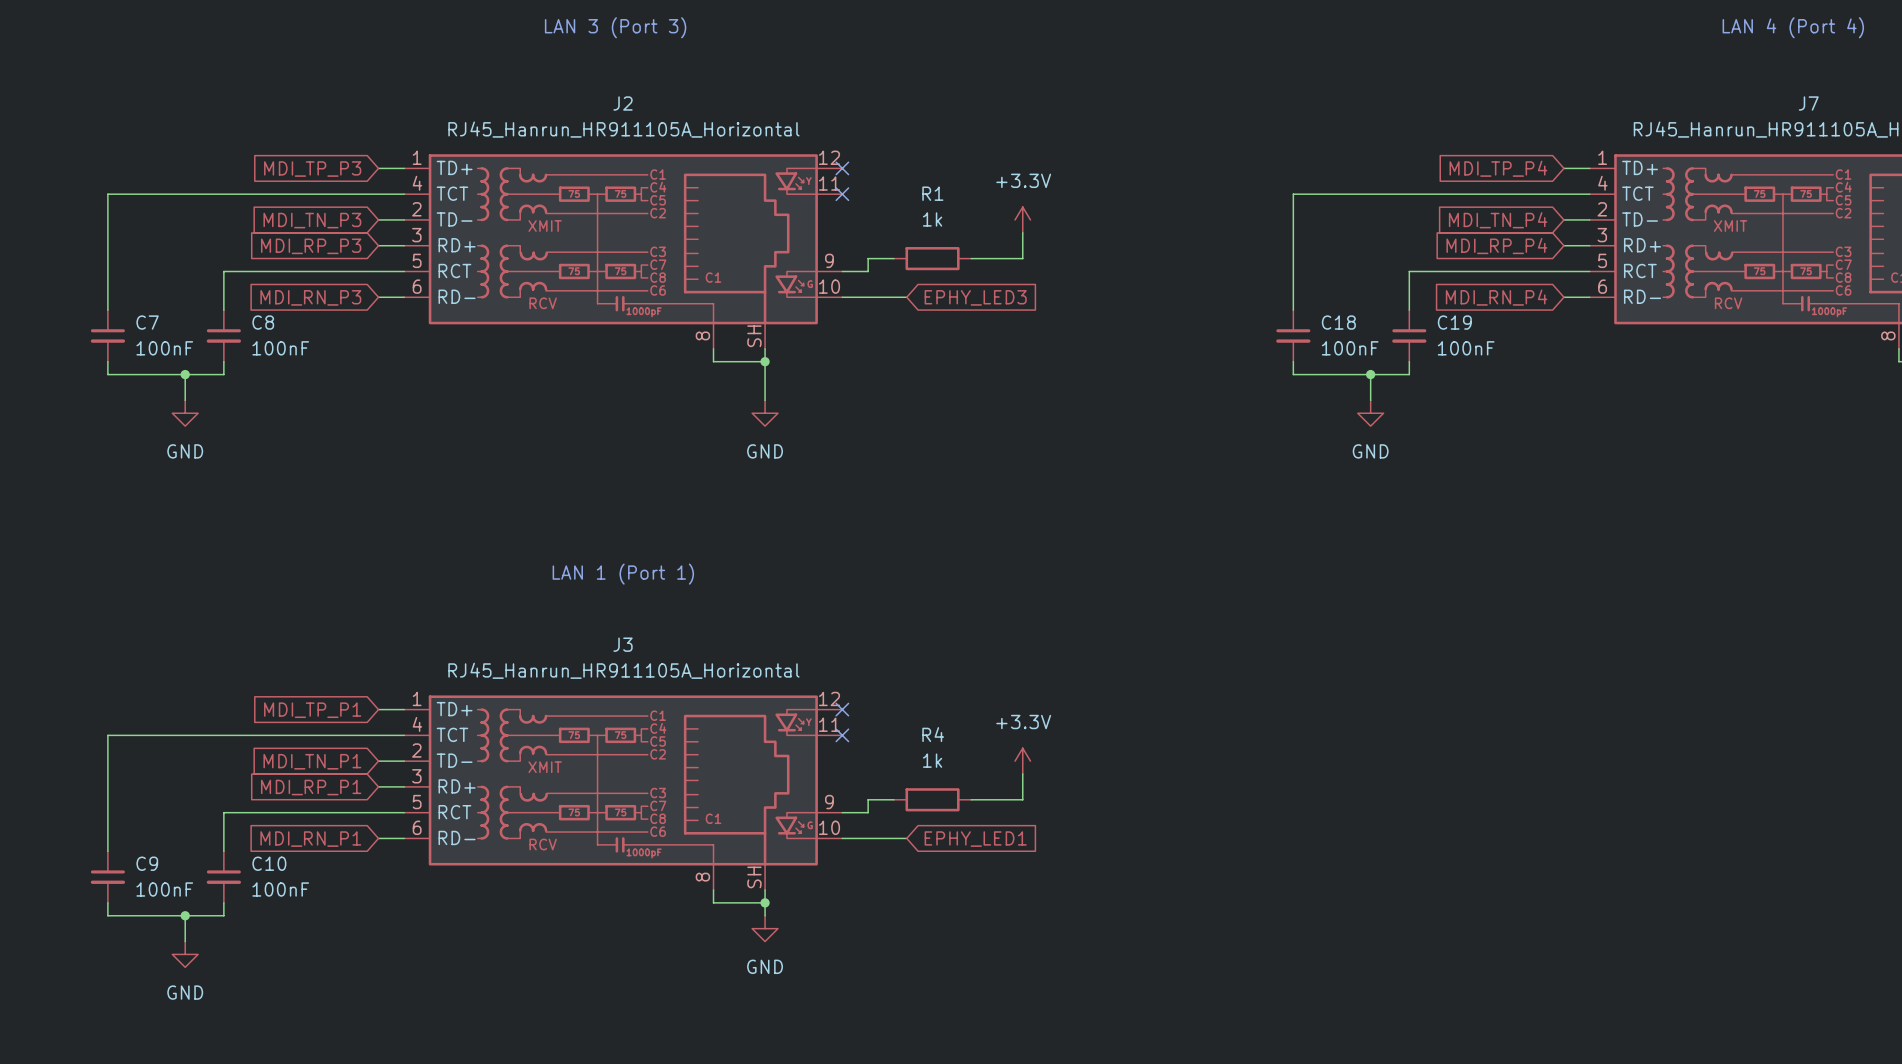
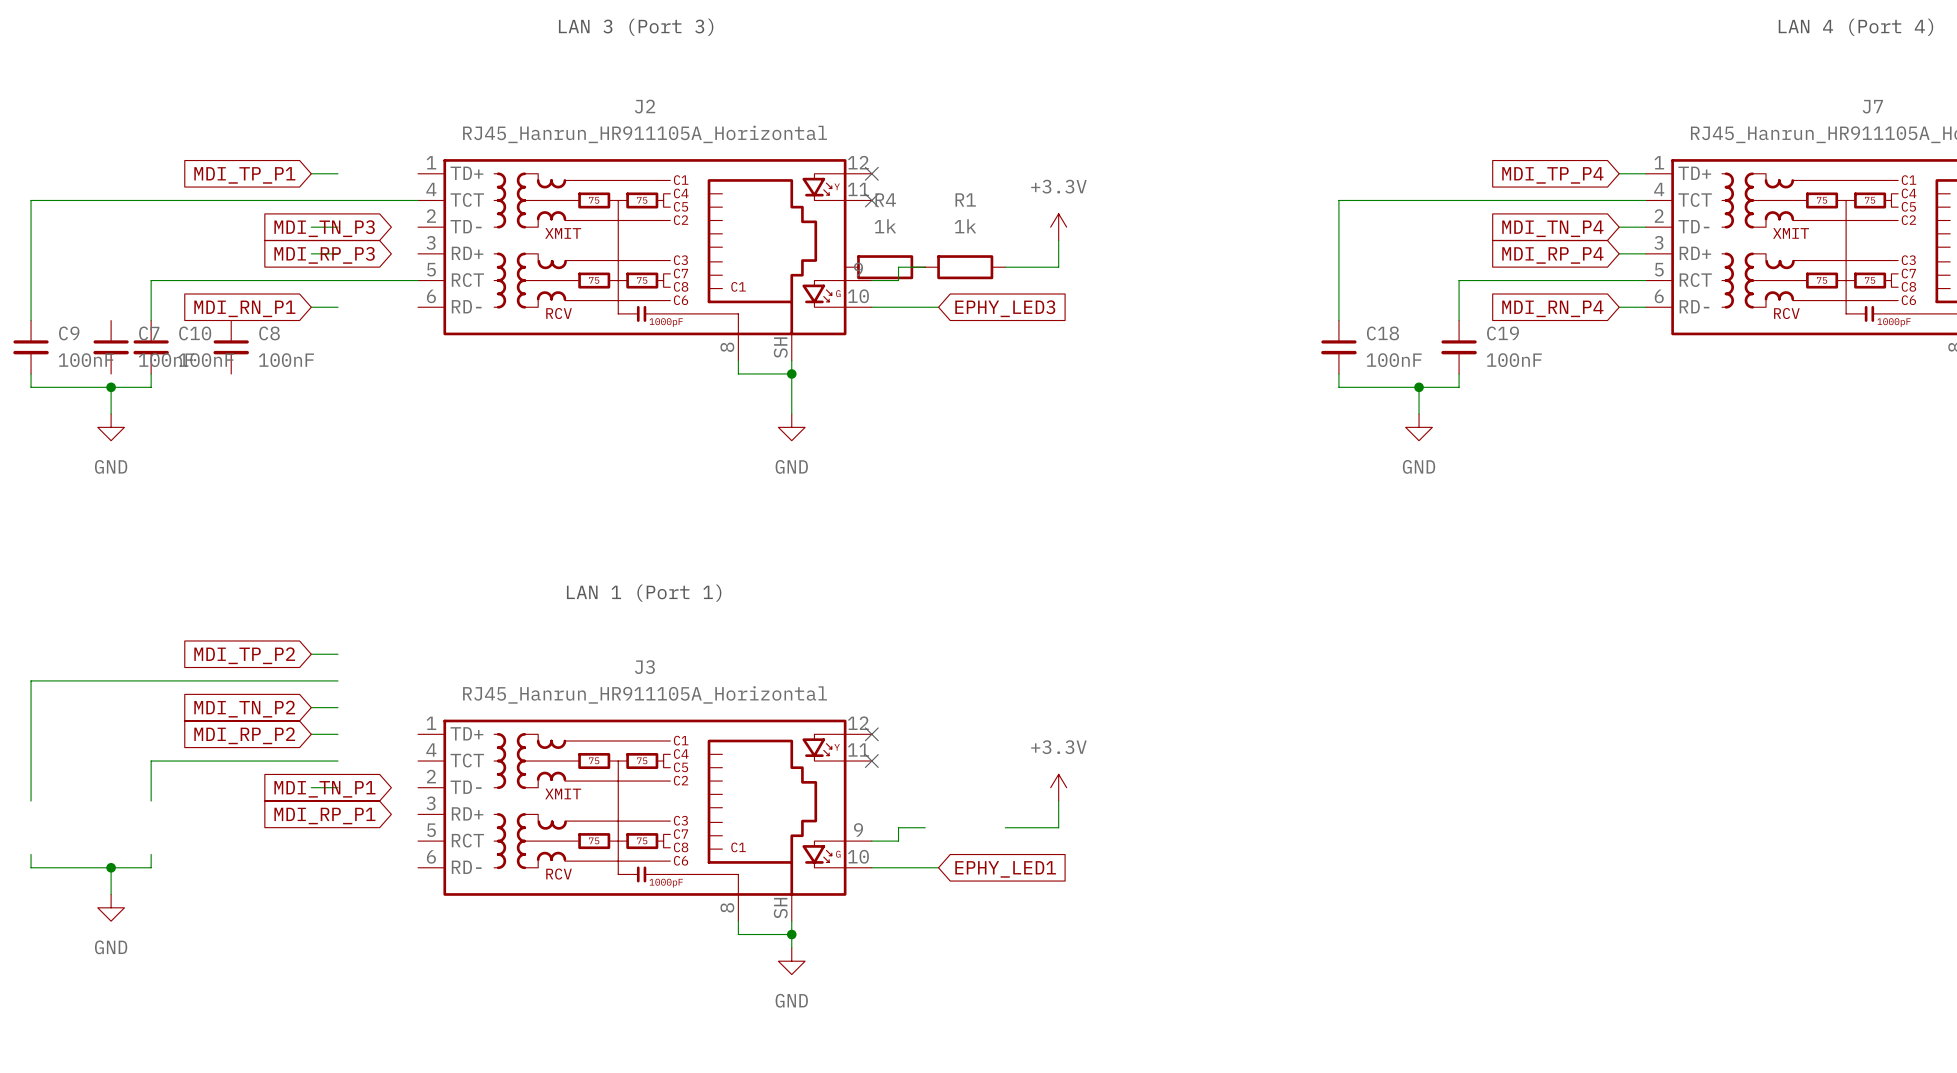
wire: (378, 168) (404, 168) -> (311, 253) (337, 253)
global label: MDI_TP_P3 (312, 169) -> MDI_TP_P1 (244, 175)
wire: (107, 194) (107, 310) -> (111, 200) (31, 200) (31, 320)
wire: (378, 219) (404, 219) -> (311, 307) (337, 307)
wire: (378, 245) (404, 245) -> (311, 173) (337, 173)
wire: (223, 271) (223, 310) -> (231, 280) (151, 280) (151, 320)
global label: MDI_RN_P3 (310, 297) -> MDI_RN_P1 (244, 308)
wire: (378, 297) (404, 297) -> (311, 227) (337, 227)
wire: none -> (31, 373) (31, 387) (111, 387) (111, 414)
wire: (107, 361) (107, 374) -> none
wire: (223, 361) (223, 374) (146, 374) -> (151, 373) (151, 387)
junction: none -> (111, 387)
wire: (185, 374) (185, 400) -> none
junction: (185, 374) -> none
power symbol position: GND (185, 413) -> GND (111, 427)
global label: none -> MDI_TP_P2 (244, 655)
wire: none -> (337, 680) (31, 680) (31, 801)
global label: none -> MDI_TN_P2 (244, 709)
wire: (378, 709) (404, 709) -> (311, 654) (337, 654)
global label: none -> MDI_RP_P2 (244, 735)
global label: MDI_TP_P1 (312, 710) -> none
wire: (146, 735) (107, 735) (107, 838) -> (151, 761) (151, 801)
wire: (326, 735) (404, 735) -> none
wire: (378, 761) (404, 761) -> (311, 707) (337, 707)
wire: (378, 786) (404, 786) -> (311, 734) (337, 734)
R4 position: (932, 799) -> (885, 267)
wire: (404, 812) (223, 812) (223, 851) -> none
junction: none -> (111, 867)
wire: (378, 838) (404, 838) -> (311, 787) (337, 787)
global label: MDI_RN_P1 (310, 839) -> none
C9 position: (107, 877) -> (31, 347)
C10 position: (223, 877) -> (151, 347)
wire: (107, 902) (107, 915) (223, 915) (223, 902) -> (31, 854) (31, 867) (151, 867) (151, 854)
wire: (185, 915) (185, 941) -> none
junction: (185, 915) -> none
power symbol position: GND (185, 954) -> GND (111, 907)

